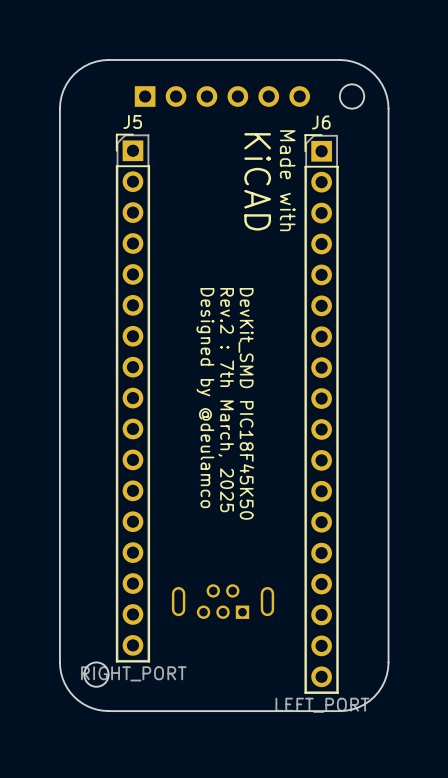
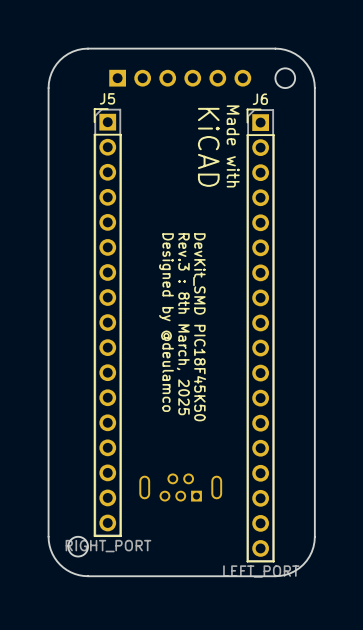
text: Rev.2 : 7th March, 2025 (226, 400) -> Rev.3 : 8th March, 2025 (183, 324)

